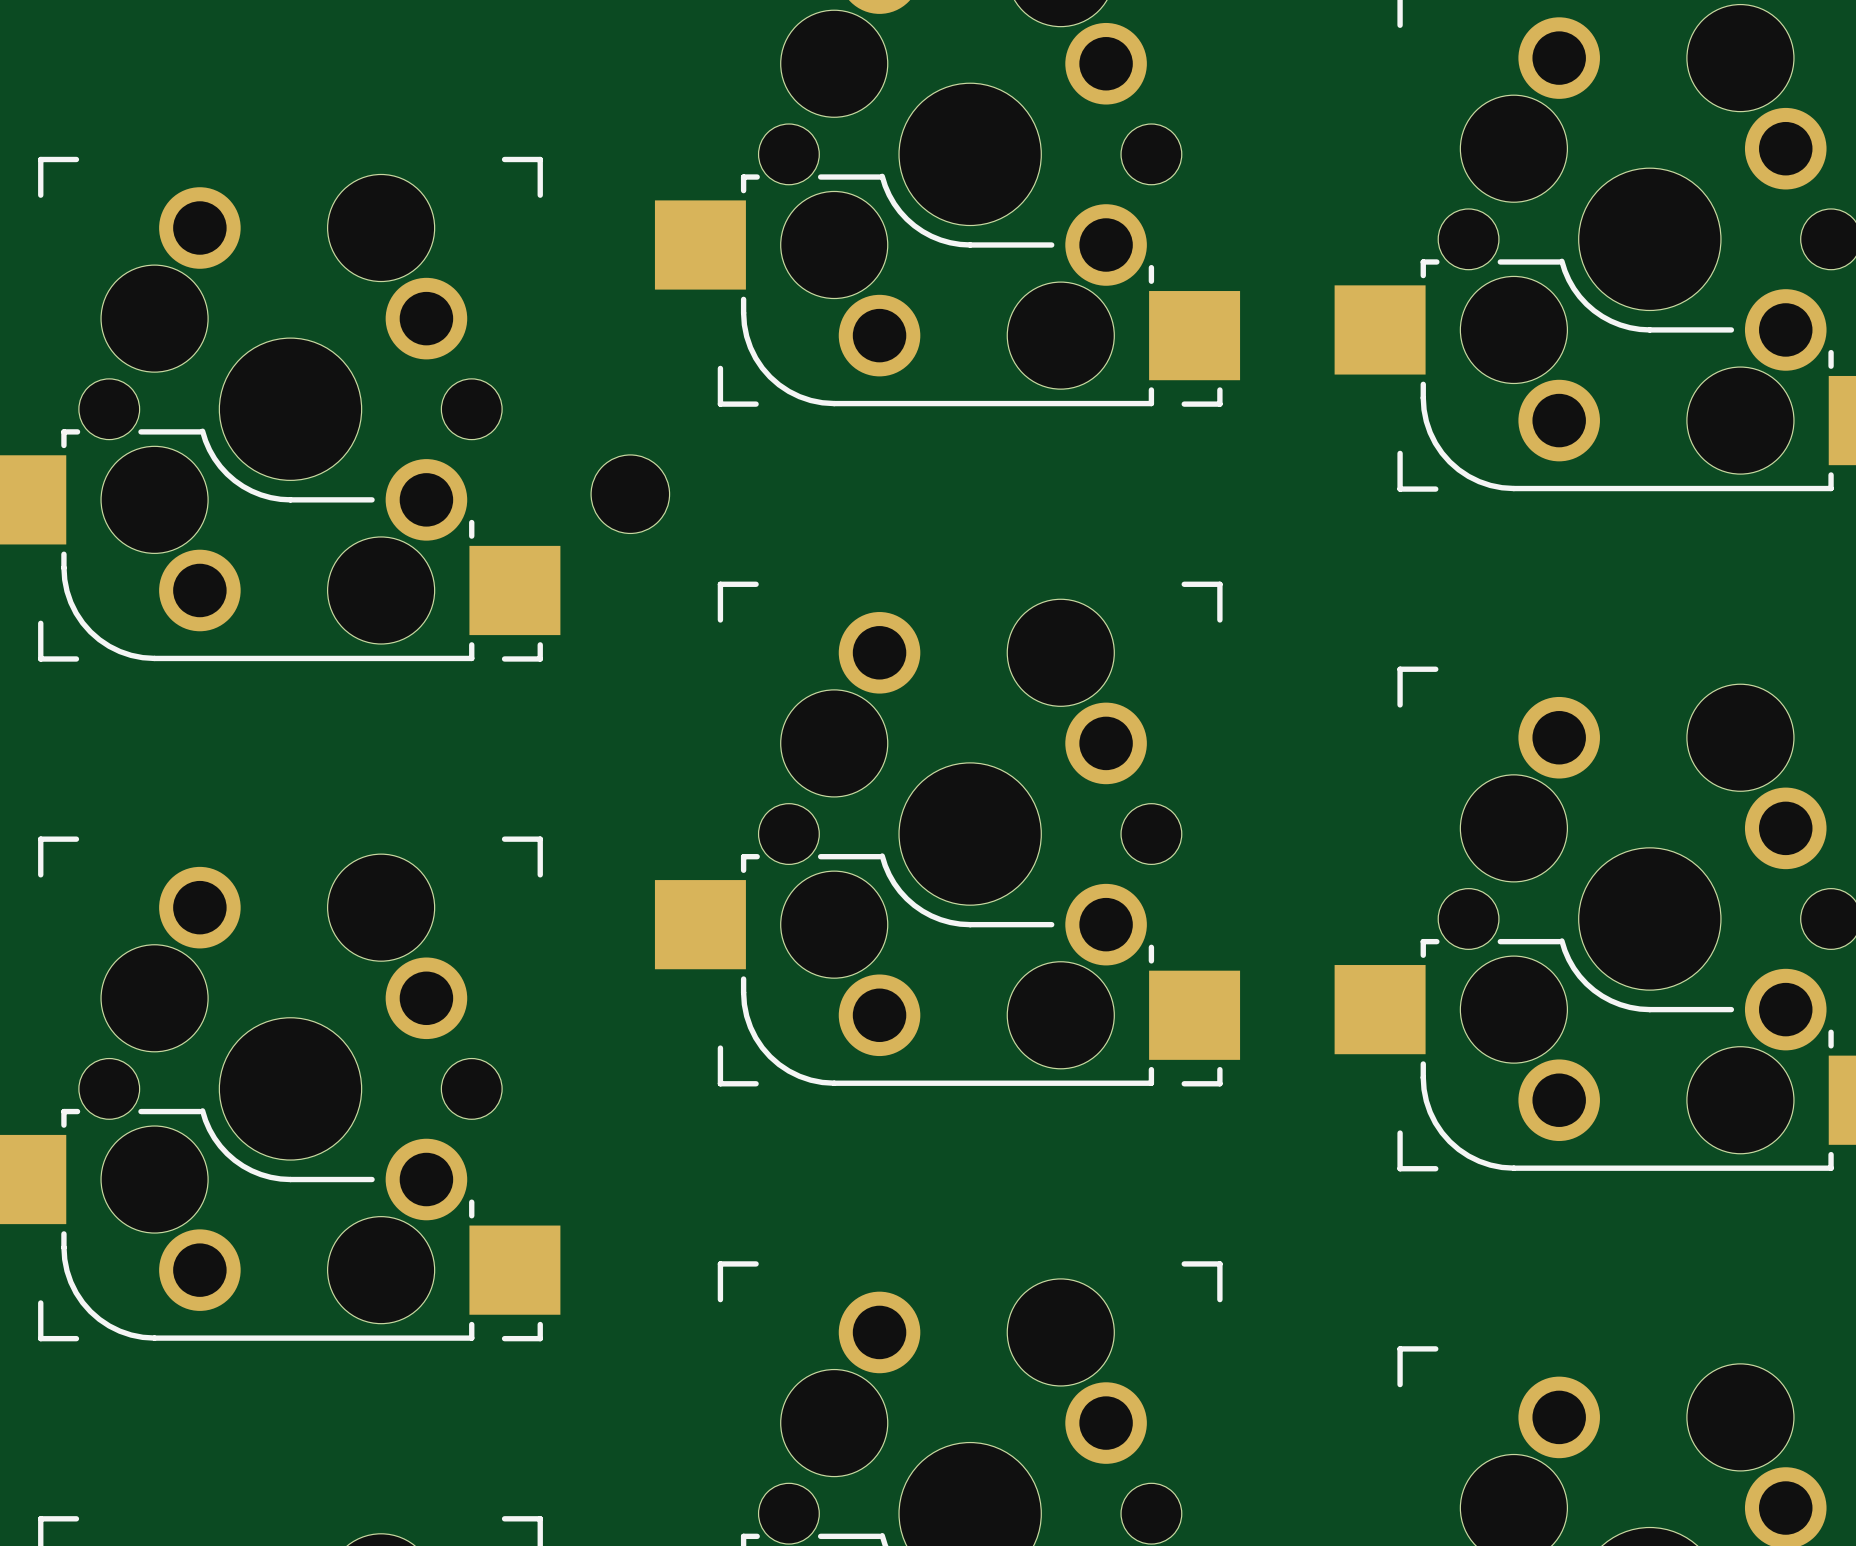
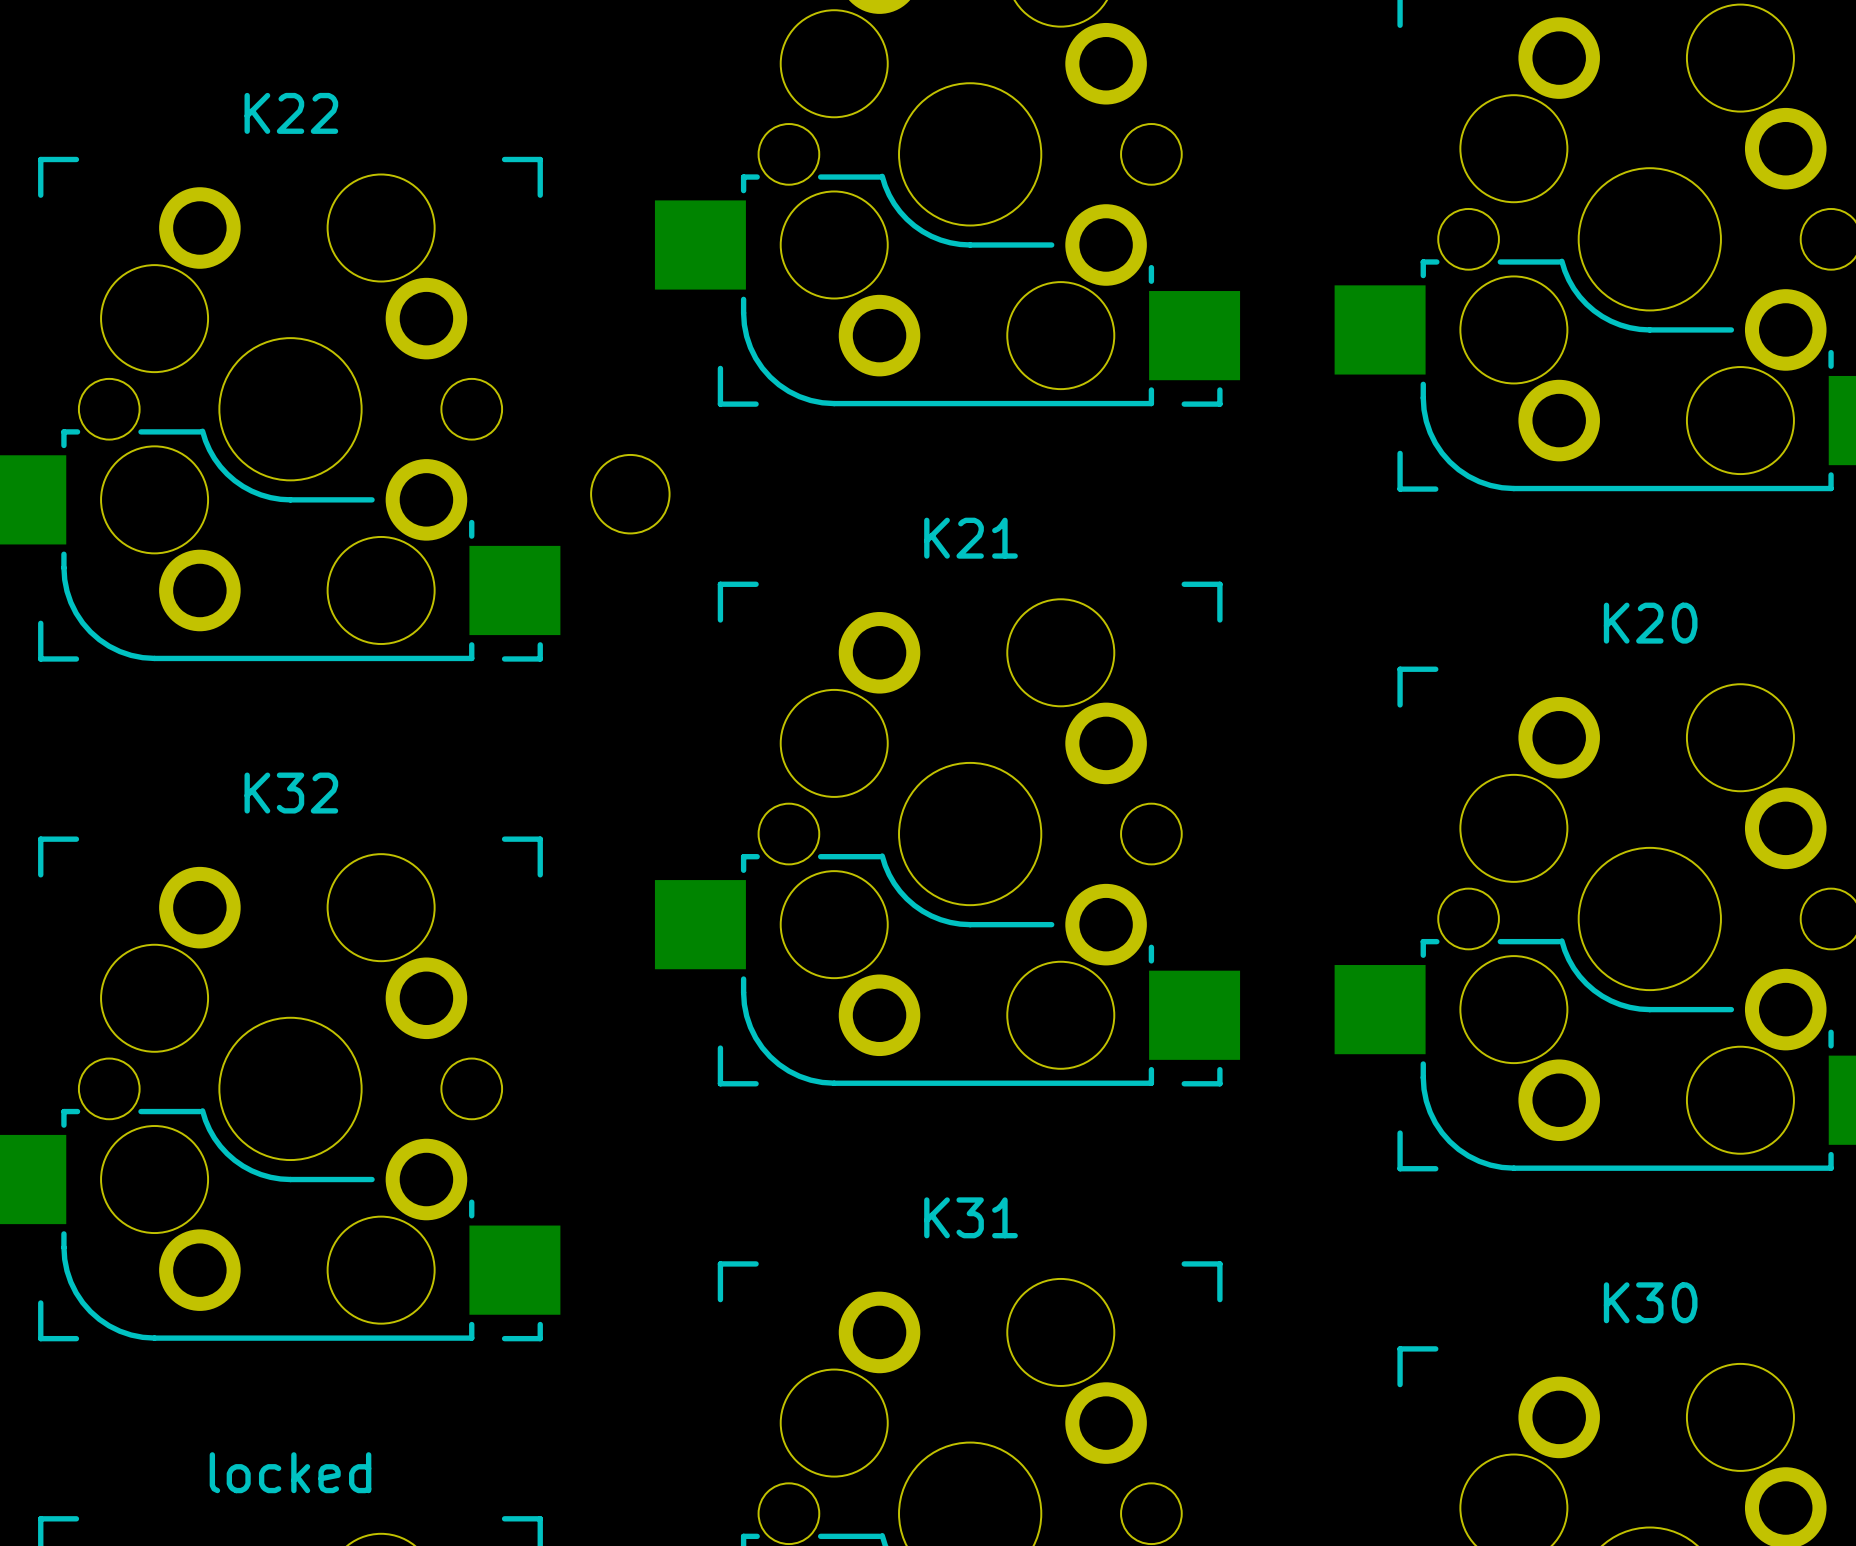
K22 name: none -> K22 (291, 113)
K21 name: none -> K21 (971, 538)
K20 name: none -> K20 (1650, 623)
K32 name: none -> K32 (291, 793)
K31 name: none -> K31 (971, 1217)
K30 name: none -> K30 (1650, 1302)
locked name: none -> locked (290, 1472)

